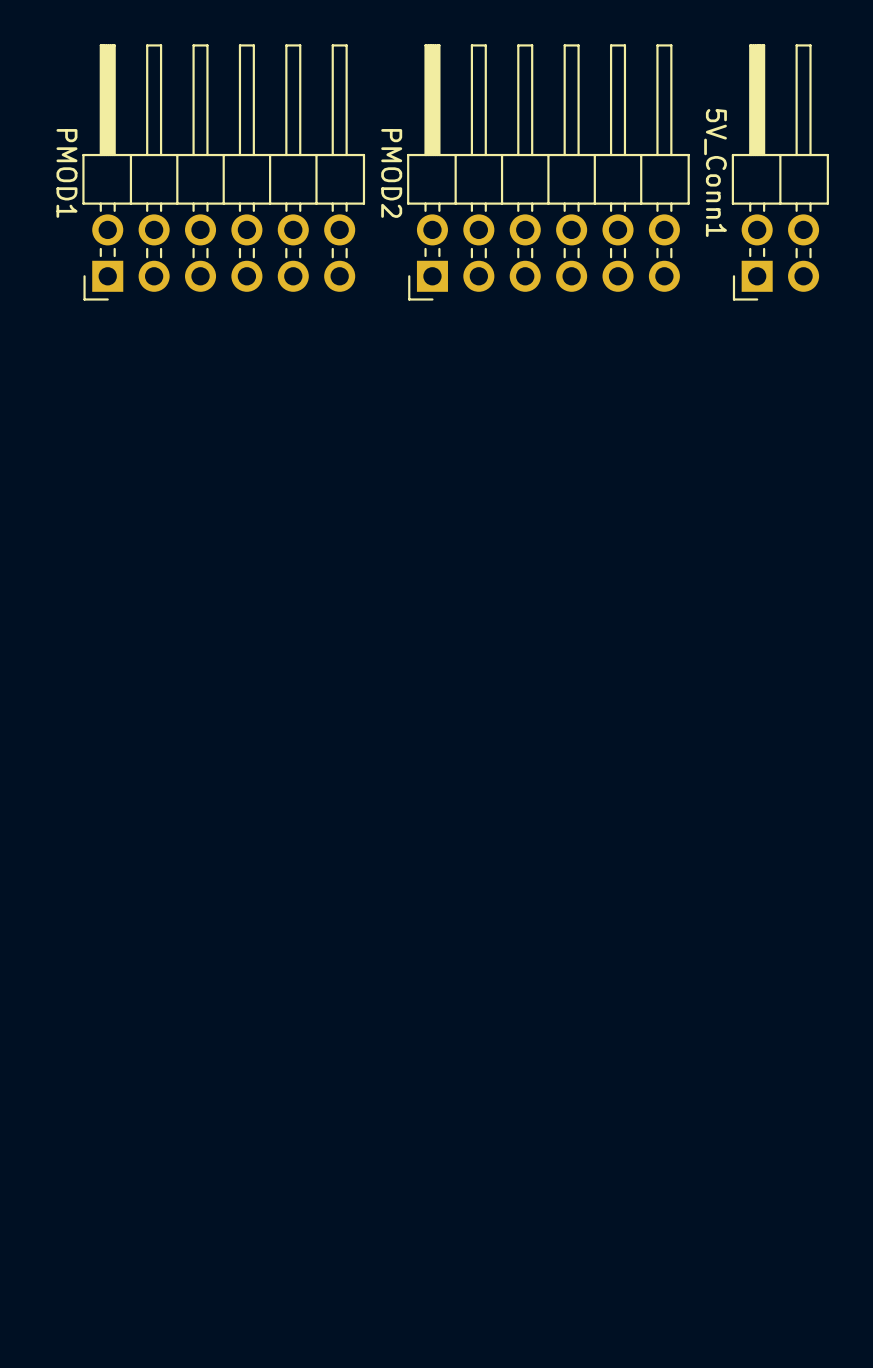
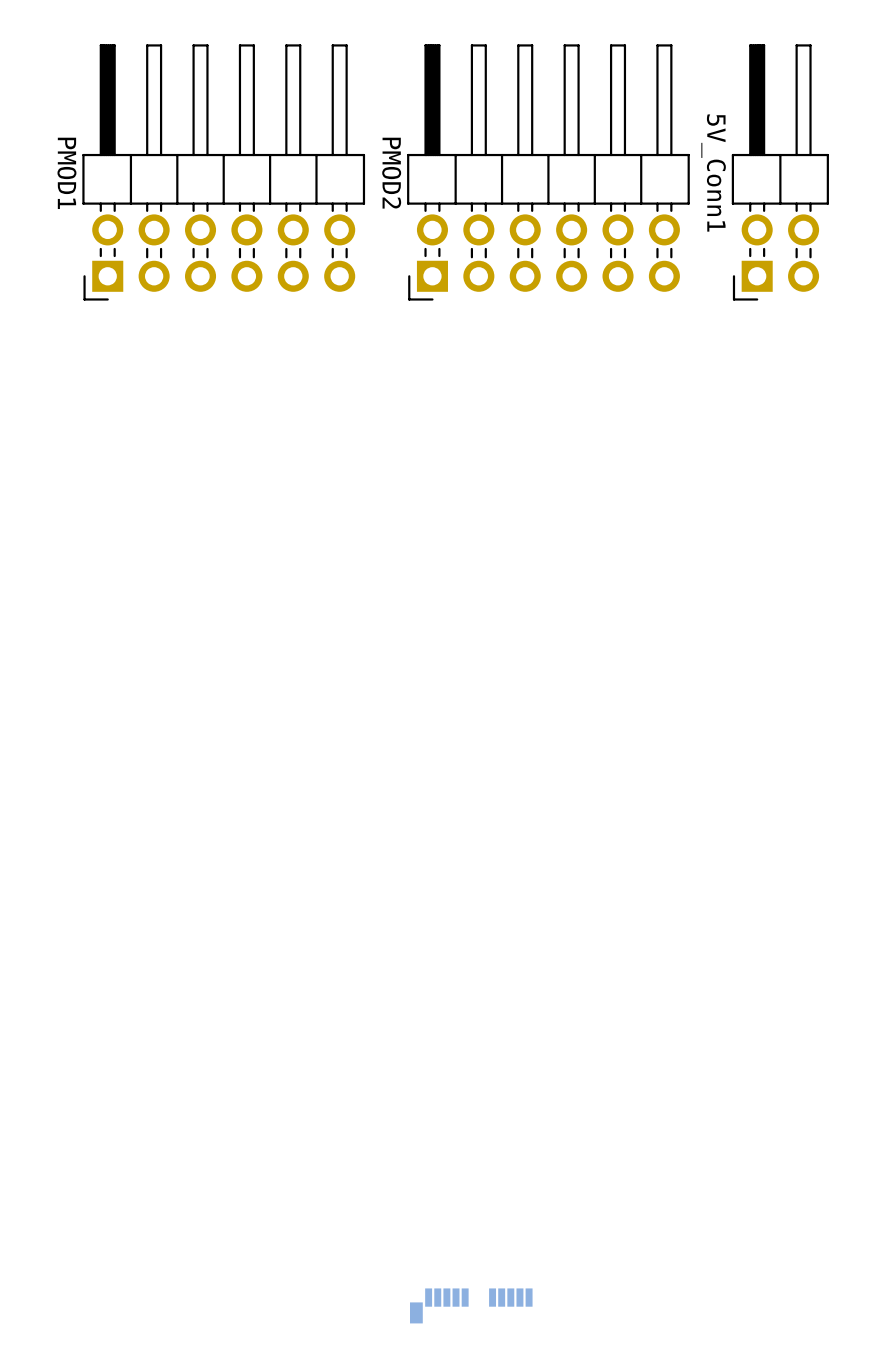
part: none -> (471, 1305)

